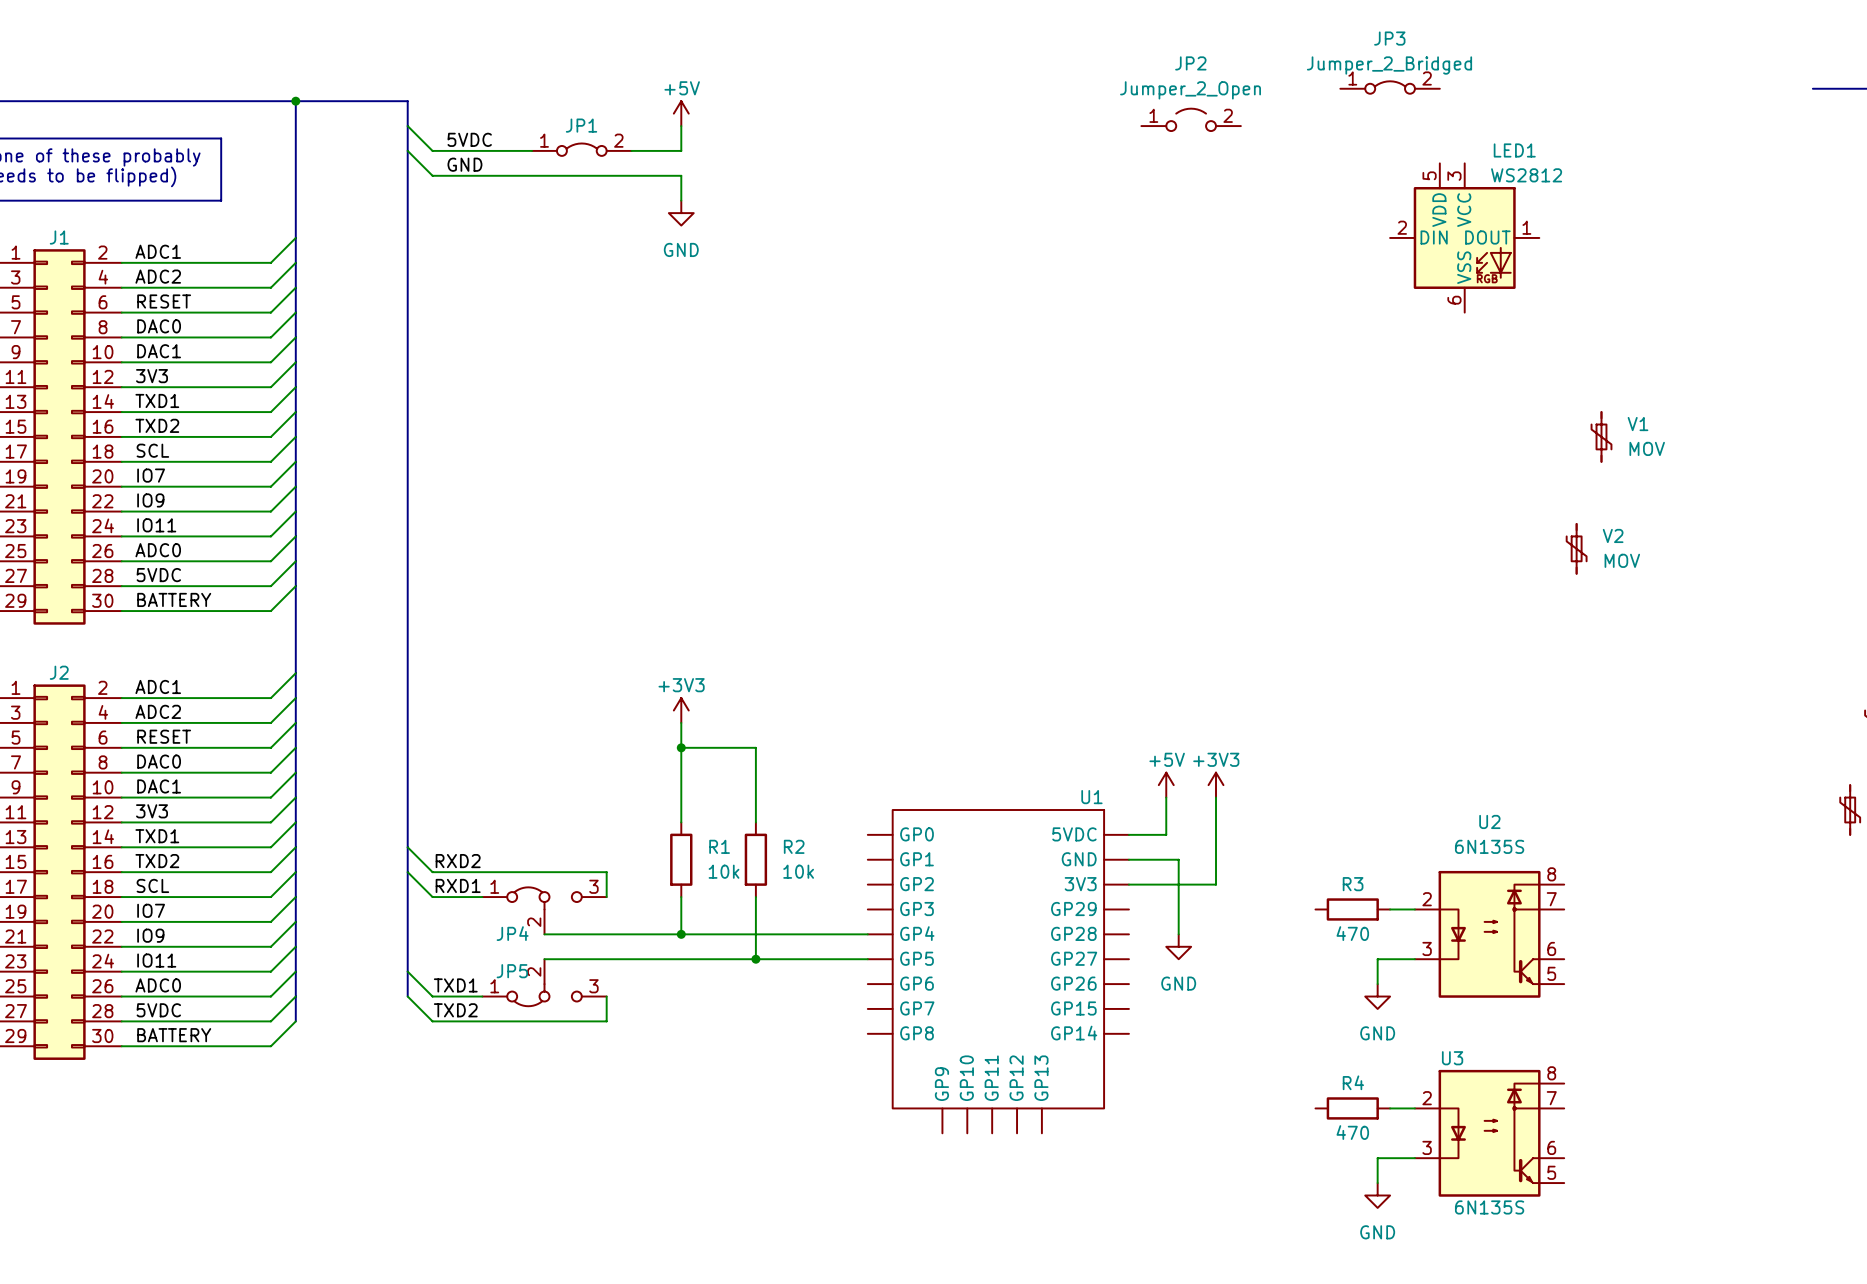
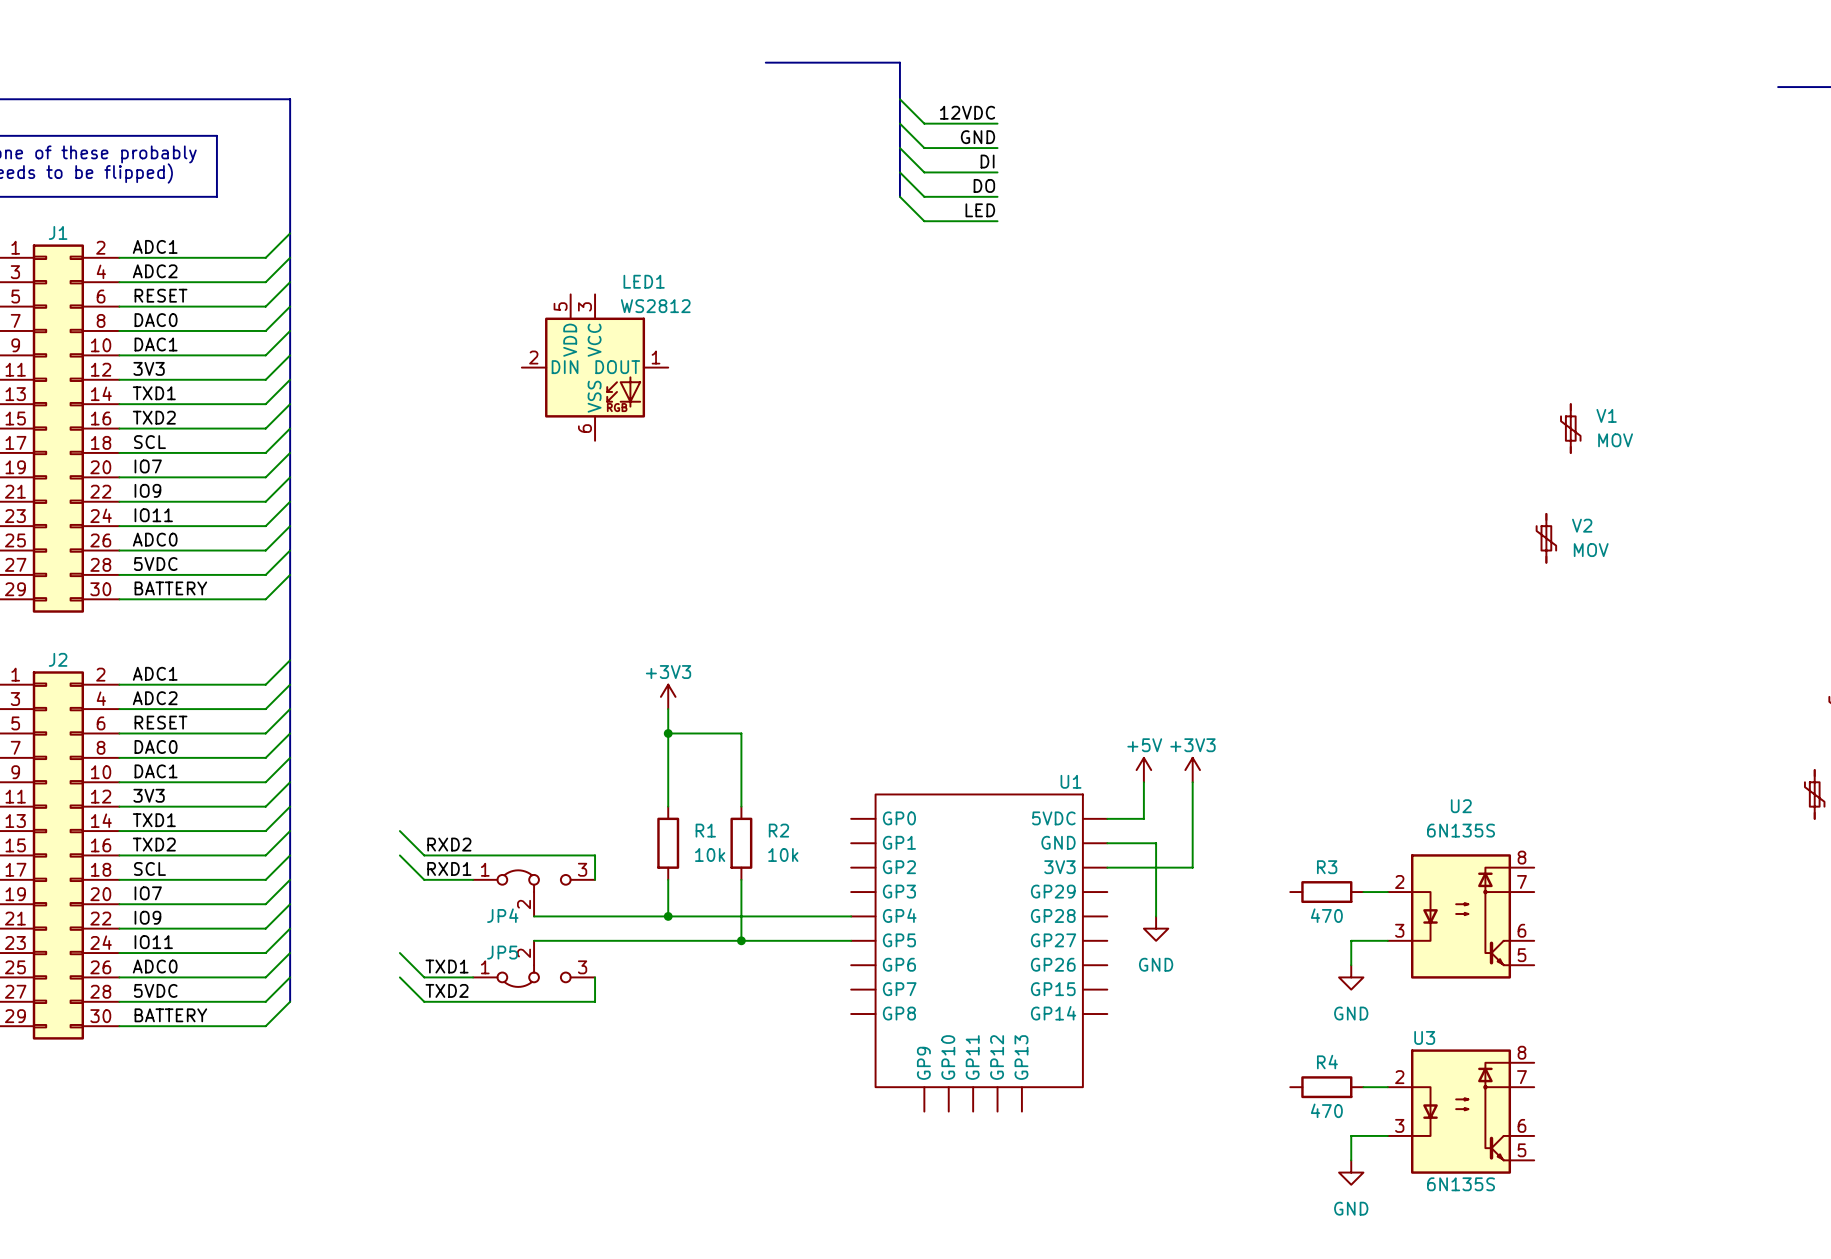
bus: none -> (765, 62) (899, 62) (899, 196)
JP3: Jumper_2_Bridged (1390, 87) -> none
bus: (295, 101) (407, 101) (407, 996) -> none
junction: (295, 101) -> none
wire: none -> (899, 99) (924, 123) (997, 123)
power symbol: +5V (681, 113) -> none
label: none -> 12VDC (967, 112)
JP2: Jumper_2_Open (1191, 119) -> none
wire: (407, 126) (432, 150) (532, 150) -> none
wire: (681, 126) (681, 150) (631, 150) -> none
wire: none -> (899, 123) (924, 148) (997, 148)
label: 5VDC (469, 139) -> none
label: none -> GND (977, 137)
JP1: (581, 149) -> none
wire: (407, 150) (432, 175) (681, 175) (681, 200) -> none
wire: none -> (899, 148) (924, 172) (997, 172)
label: GND (464, 164) -> none
label: none -> DI (987, 161)
wire: none -> (899, 172) (924, 196) (997, 196)
label: none -> DO (984, 185)
wire: none -> (899, 196) (924, 221) (997, 221)
power symbol: GND (681, 213) -> none
label: none -> LED (980, 210)
LED1 position: (1464, 237) -> (595, 367)

